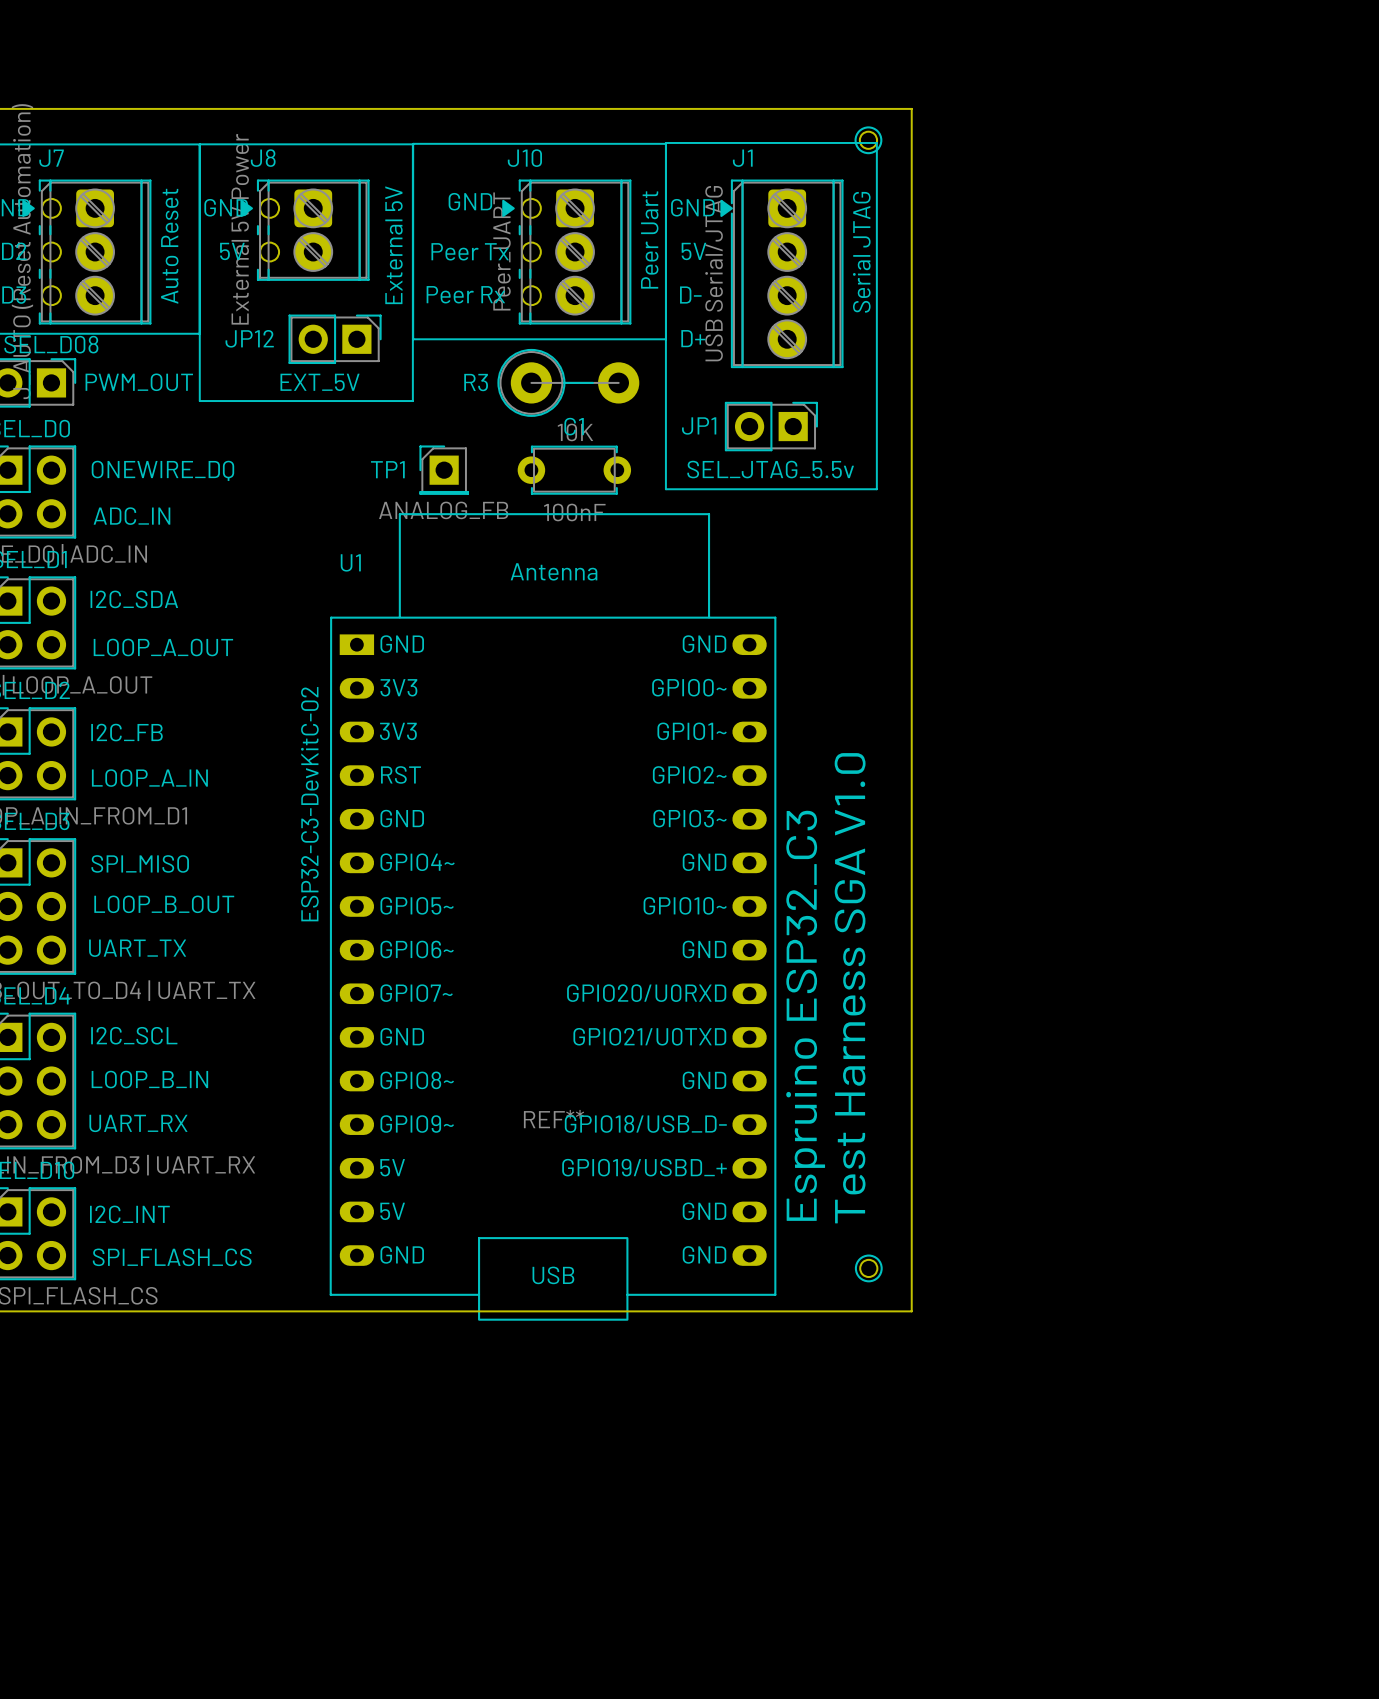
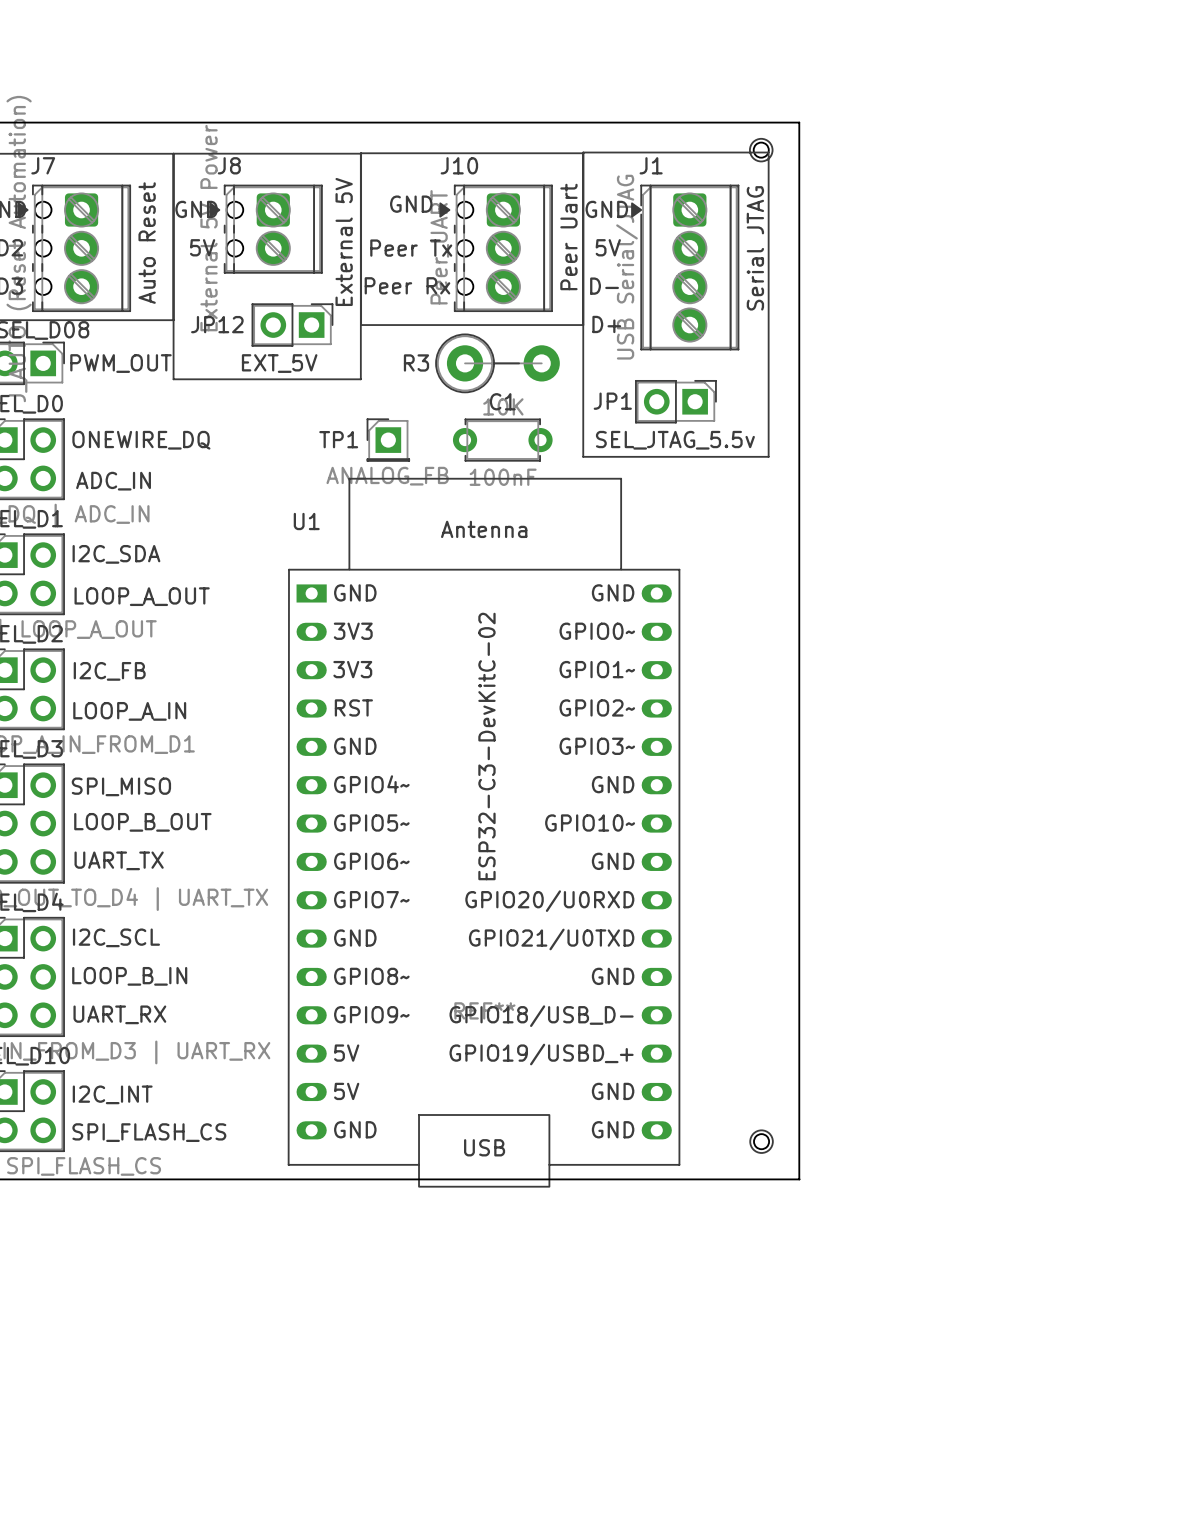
U1 value position: ESP32-C3-DevKitC-02 (309, 804) -> ESP32-C3-DevKitC-02 (486, 746)
text: Test Harness SGA V1.0 (850, 988) -> none
text: Espruino ESP32_C3 (805, 1015) -> none

